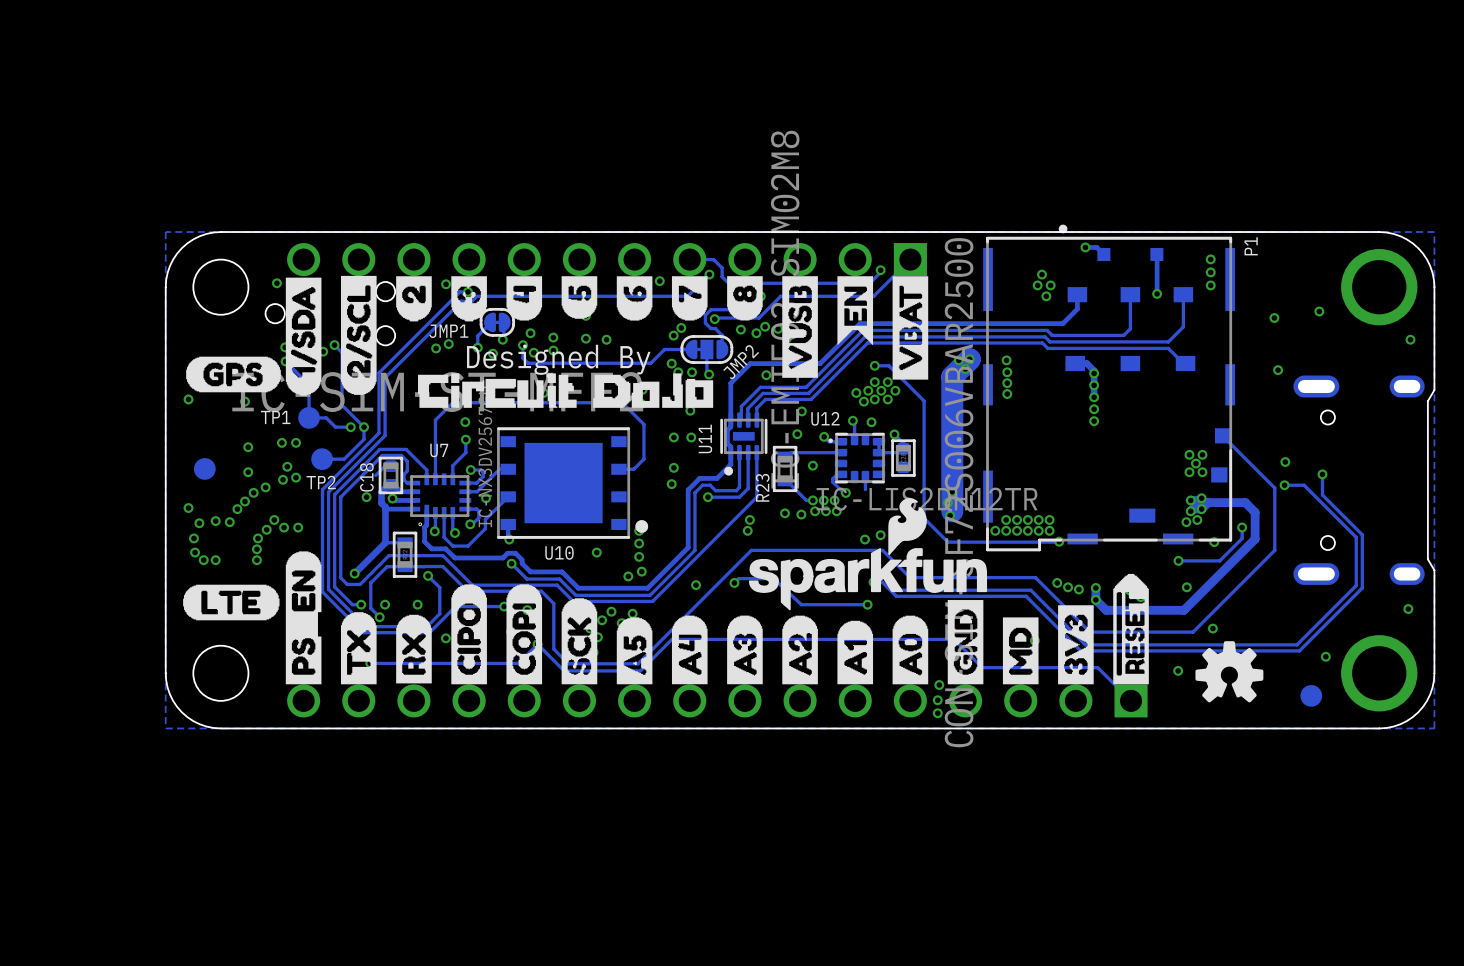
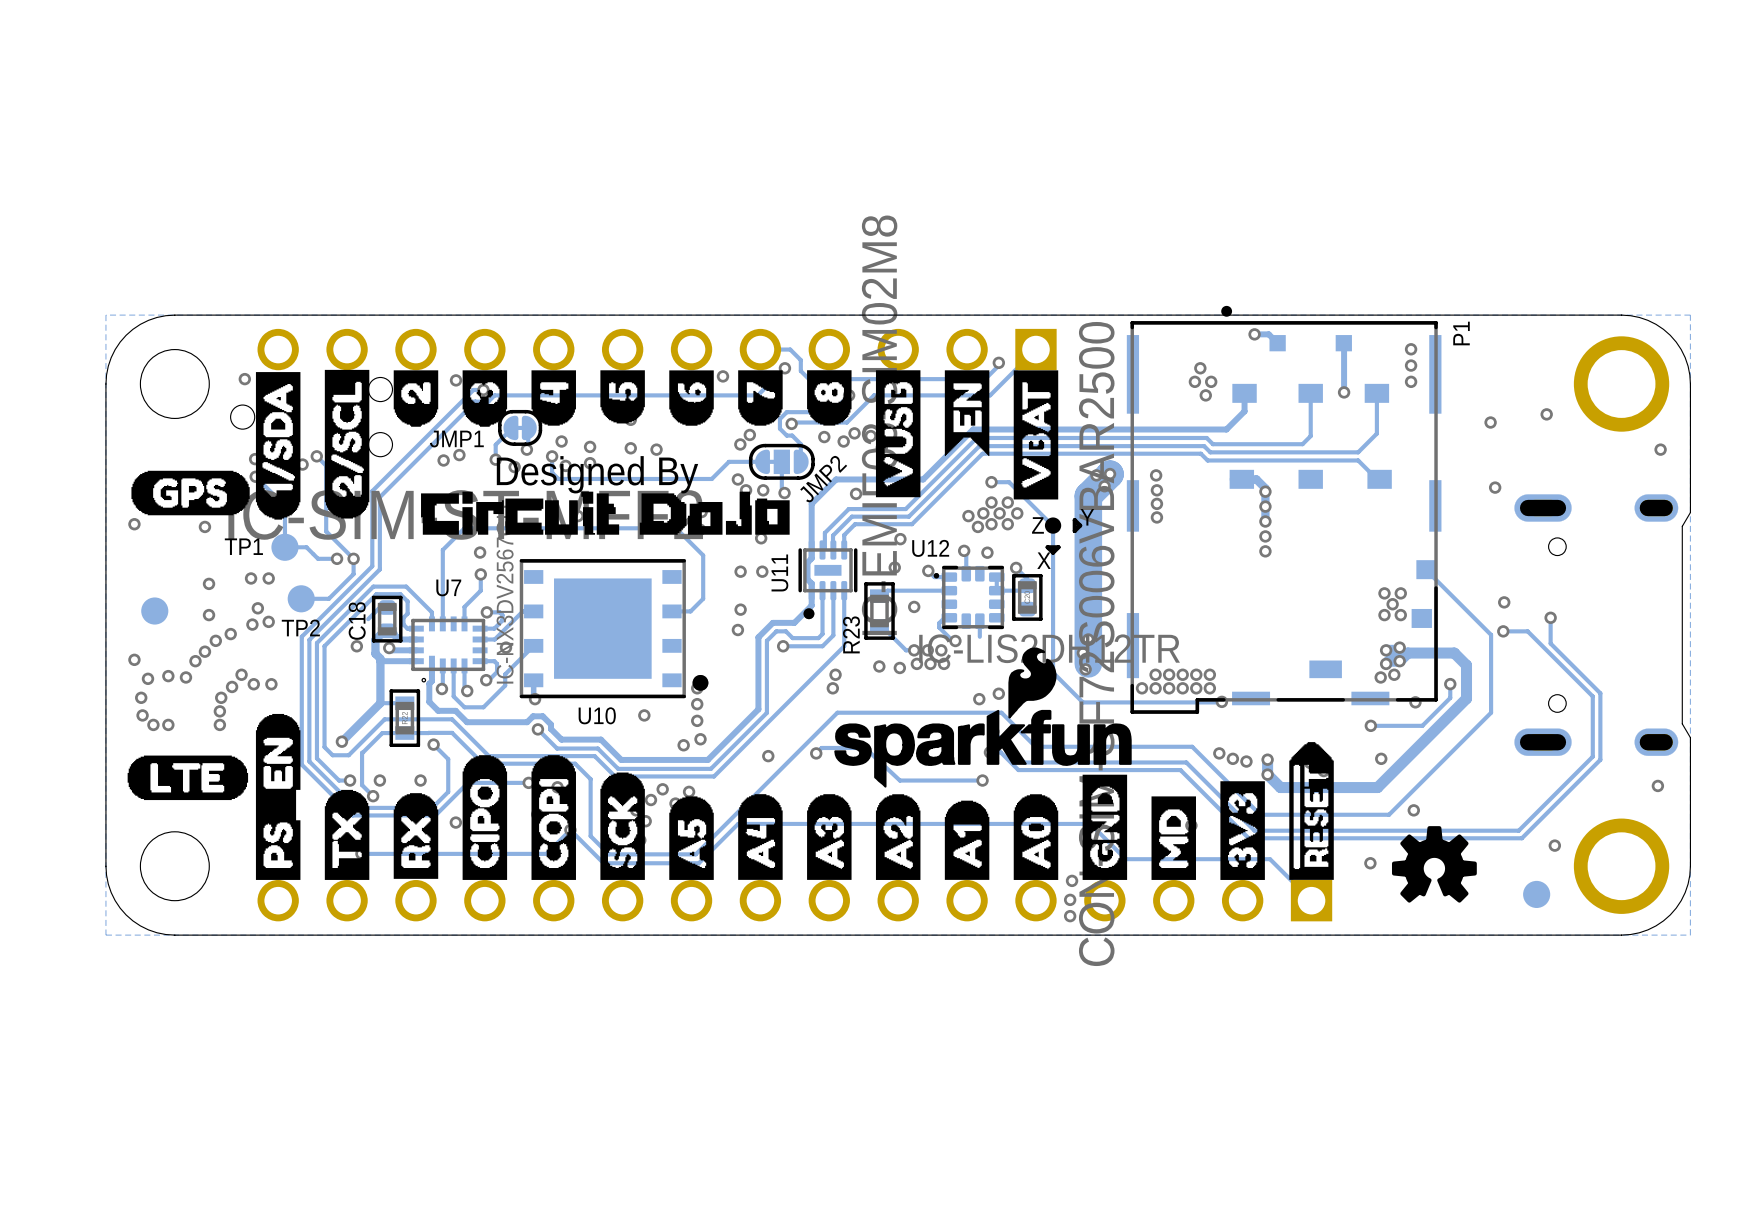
text: none -> Y (1087, 517)
drawing: none -> [1044, 517, 1062, 534]
line: none -> (1074, 520) (1080, 525) (1074, 531) (1074, 520)
text: none -> Z (1037, 525)
line: none -> (1058, 547) (1047, 547) (1053, 552) (1058, 547)
text: none -> X (1044, 560)

